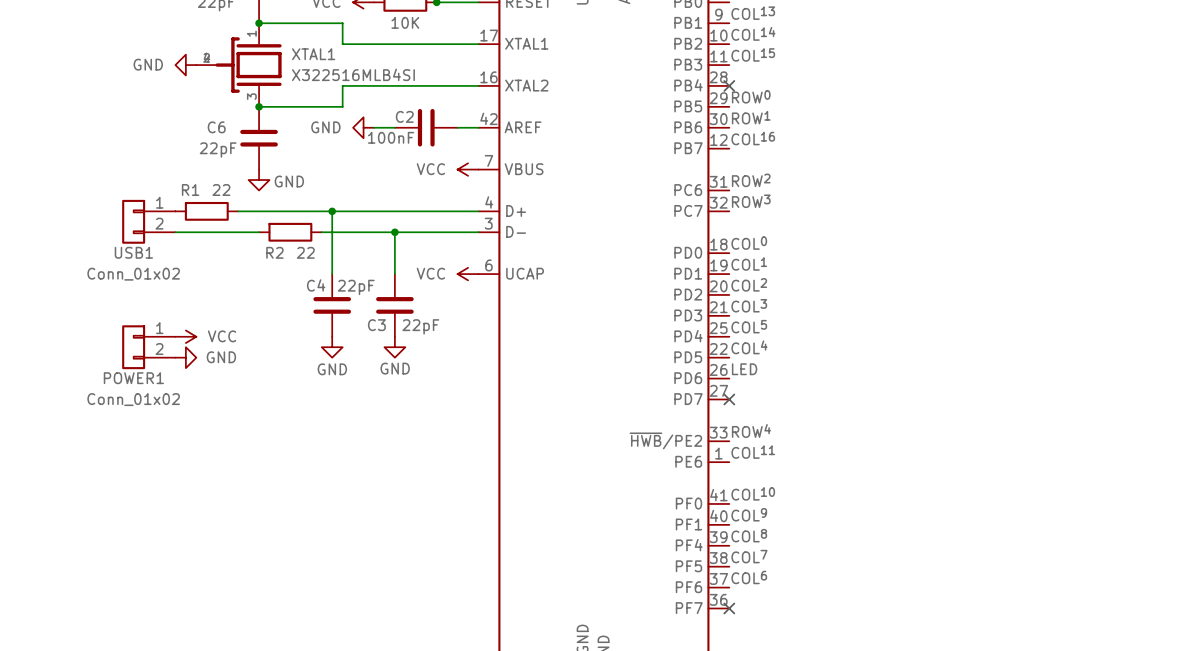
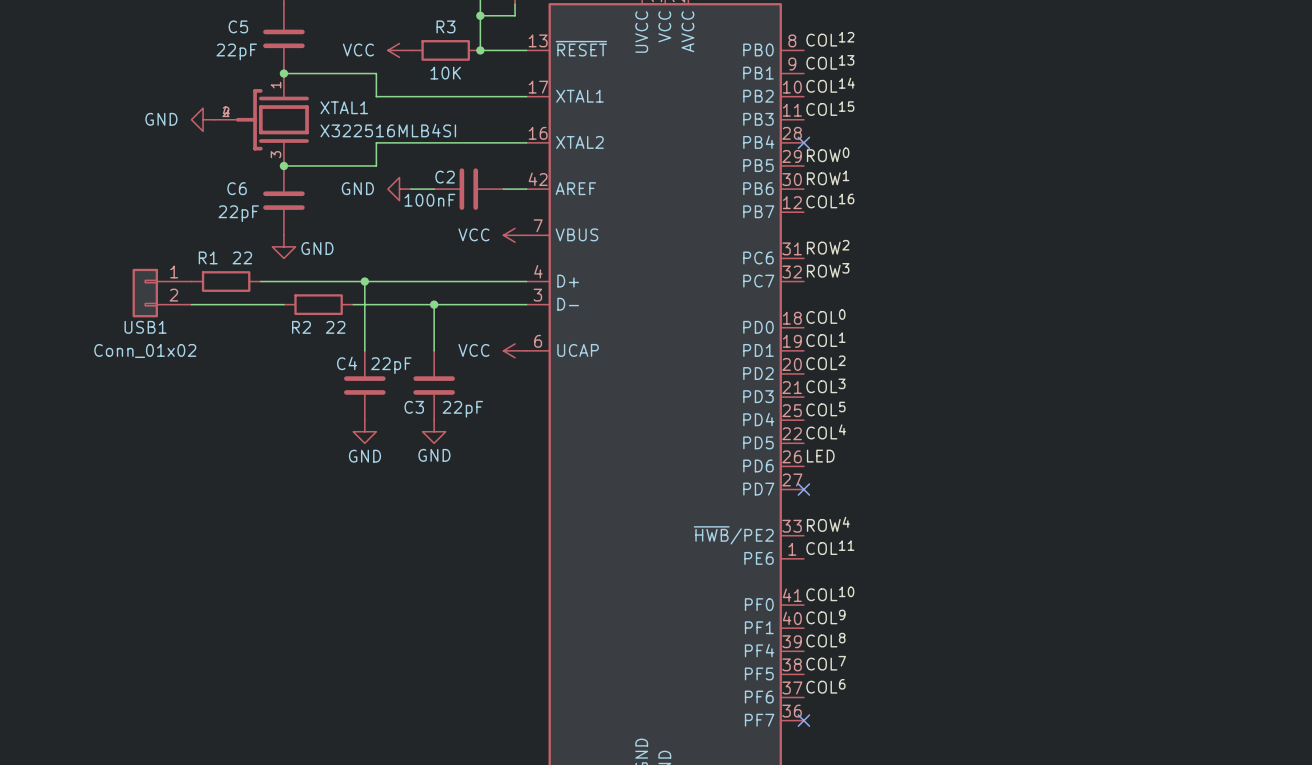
power symbol: VCC (185, 336) -> none
POWER1: Conn_01x02 (148, 347) -> none
power symbol: GND (185, 357) -> none

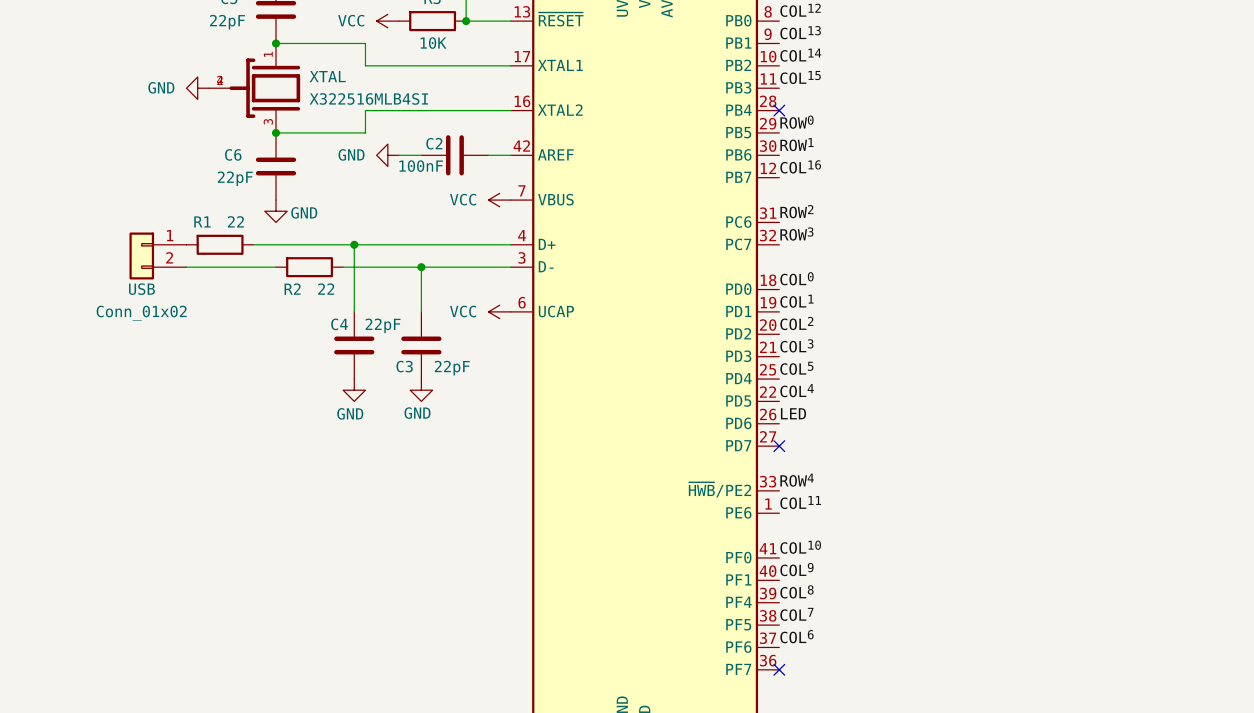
XTAL1 name: XTAL1 (344, 107) -> XTAL (327, 76)
USB1 name: USB1 (145, 327) -> USB (141, 289)

